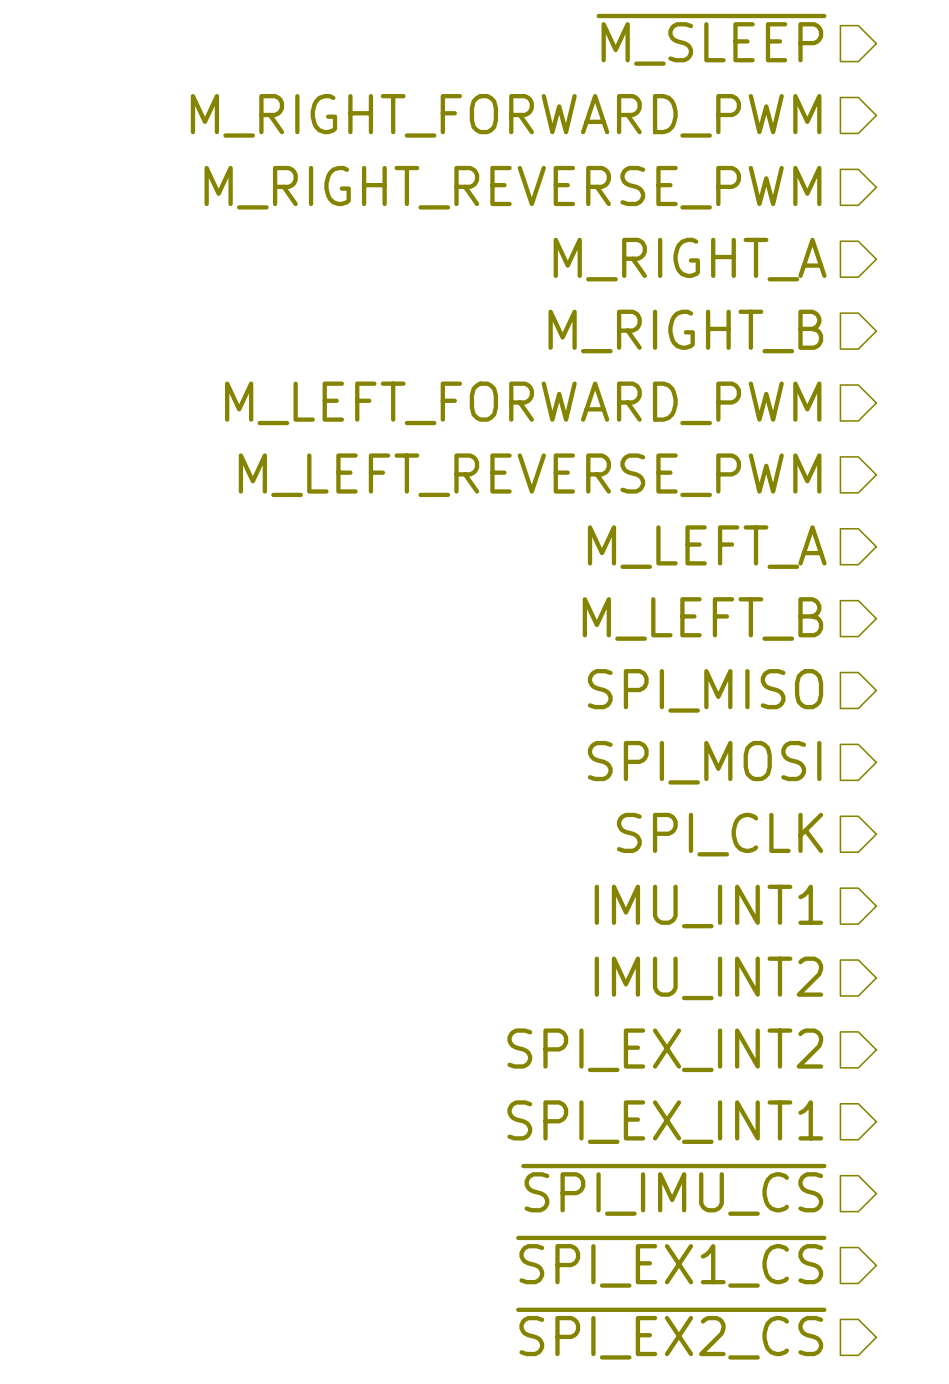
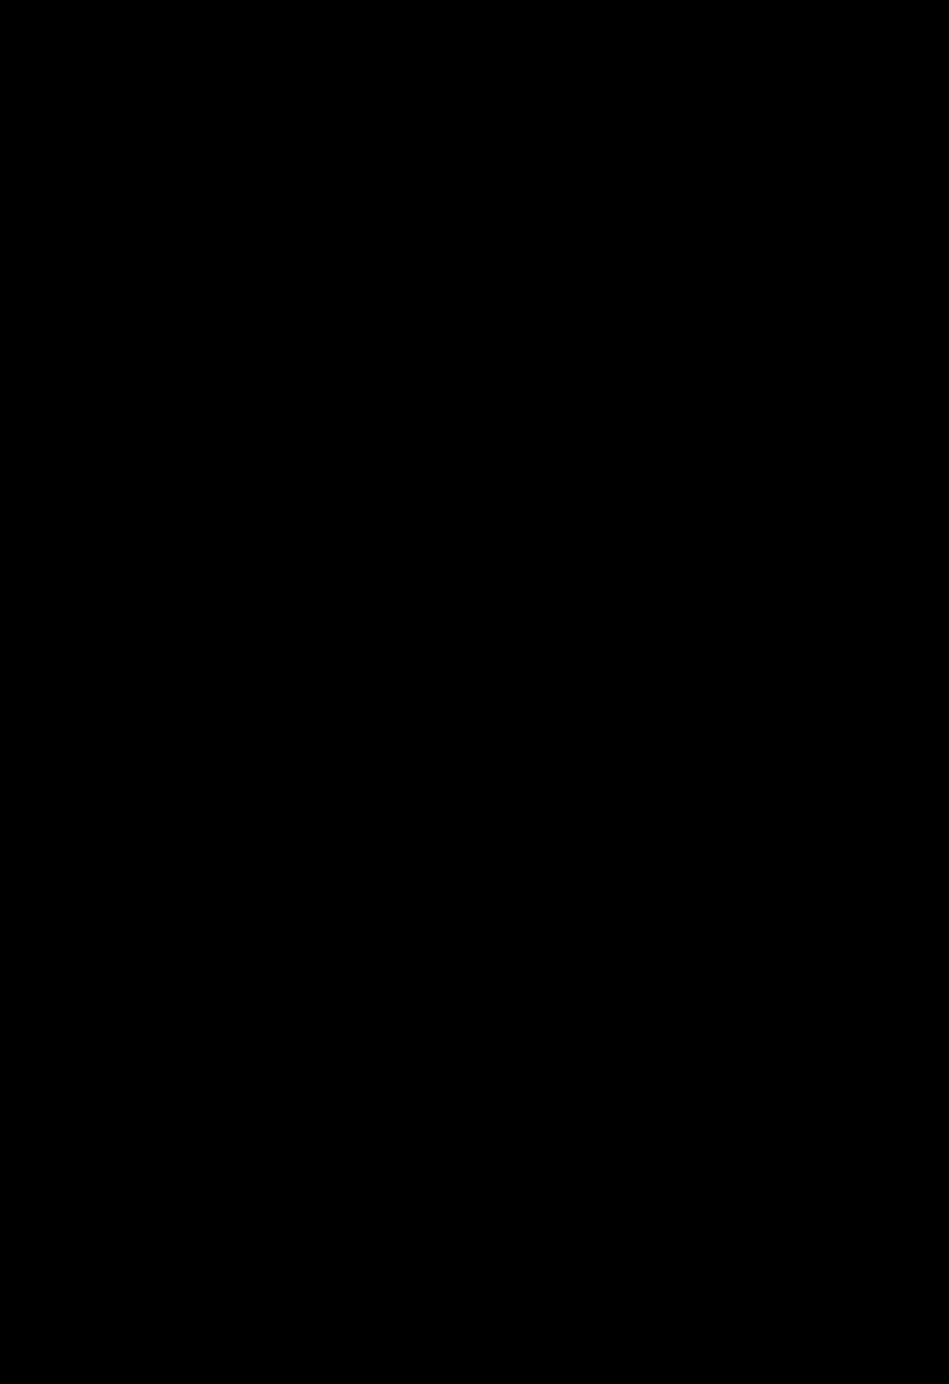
hierarchical label: ~{M_SLEEP} (711, 39) -> none
hierarchical label: M_RIGHT_FORWARD_PWM (506, 115) -> none
hierarchical label: M_RIGHT_REVERSE_PWM (512, 187) -> none
hierarchical label: M_RIGHT_A (690, 259) -> none
hierarchical label: M_RIGHT_B (685, 331) -> none
hierarchical label: M_LEFT_FORWARD_PWM (523, 403) -> none
hierarchical label: M_LEFT_REVERSE_PWM (530, 475) -> none
hierarchical label: M_LEFT_A (707, 547) -> none
hierarchical label: M_LEFT_B (702, 618) -> none
hierarchical label: SPI_MISO (705, 690) -> none
hierarchical label: SPI_MOSI (704, 762) -> none
hierarchical label: SPI_CLK (720, 834) -> none
hierarchical label: IMU_INT1 (708, 906) -> none
hierarchical label: IMU_INT2 (708, 978) -> none
hierarchical label: SPI_EX_INT2 (665, 1050) -> none
hierarchical label: SPI_EX_INT1 (665, 1122) -> none
hierarchical label: ~{SPI_IMU_CS} (673, 1189) -> none
hierarchical label: ~{SPI_EX1_CS} (671, 1261) -> none
hierarchical label: ~{SPI_EX2_CS} (671, 1333) -> none

